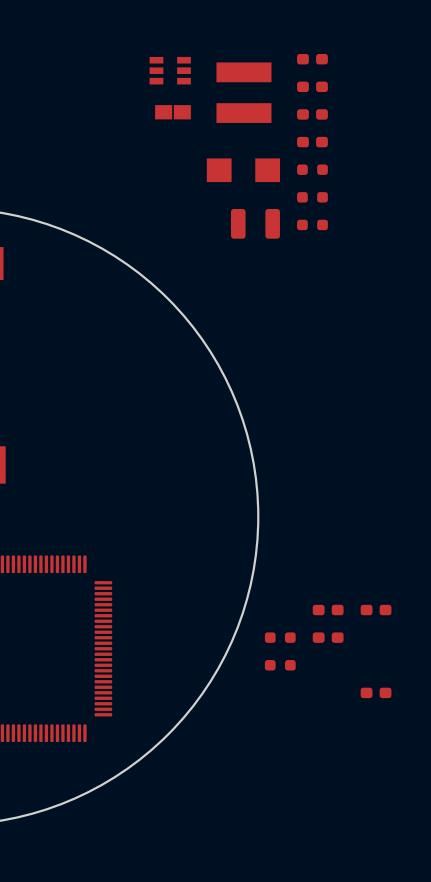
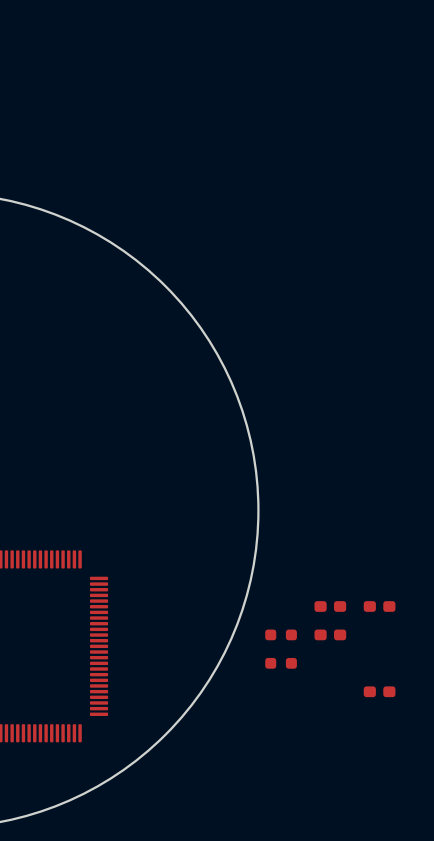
part: (312, 59) -> none
part: (170, 70) -> none
part: (312, 86) -> none
part: (243, 92) -> none
part: (172, 112) -> none
part: (312, 114) -> none
part: (312, 142) -> none
part: (312, 169) -> none
part: (243, 170) -> none
part: (312, 197) -> none
part: (255, 223) -> none
part: (312, 224) -> none

